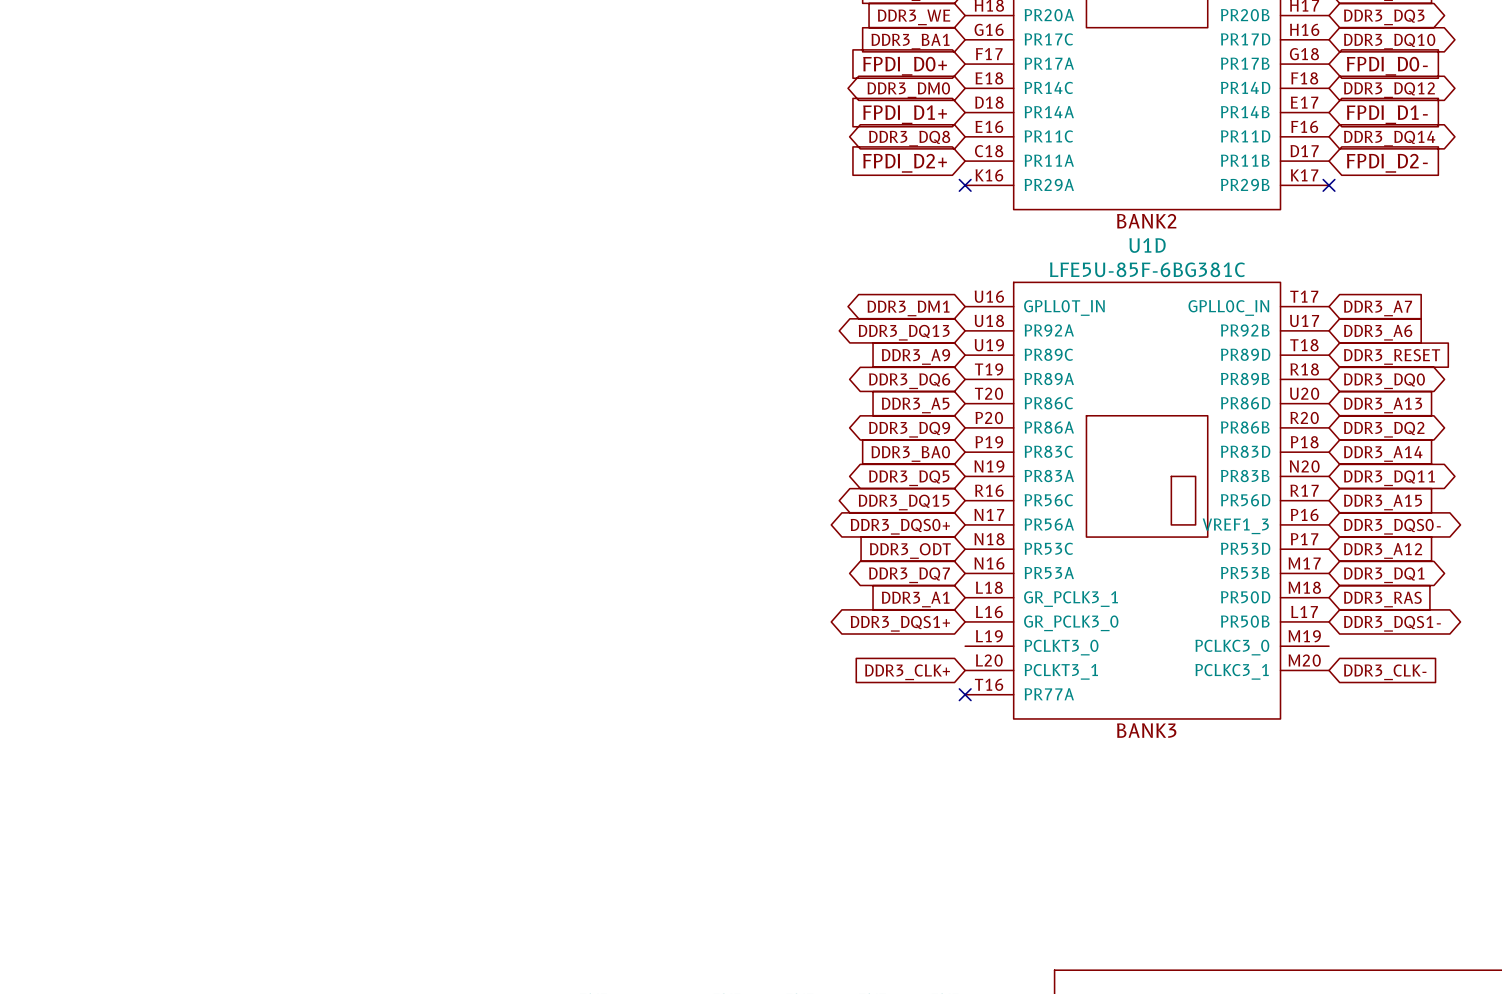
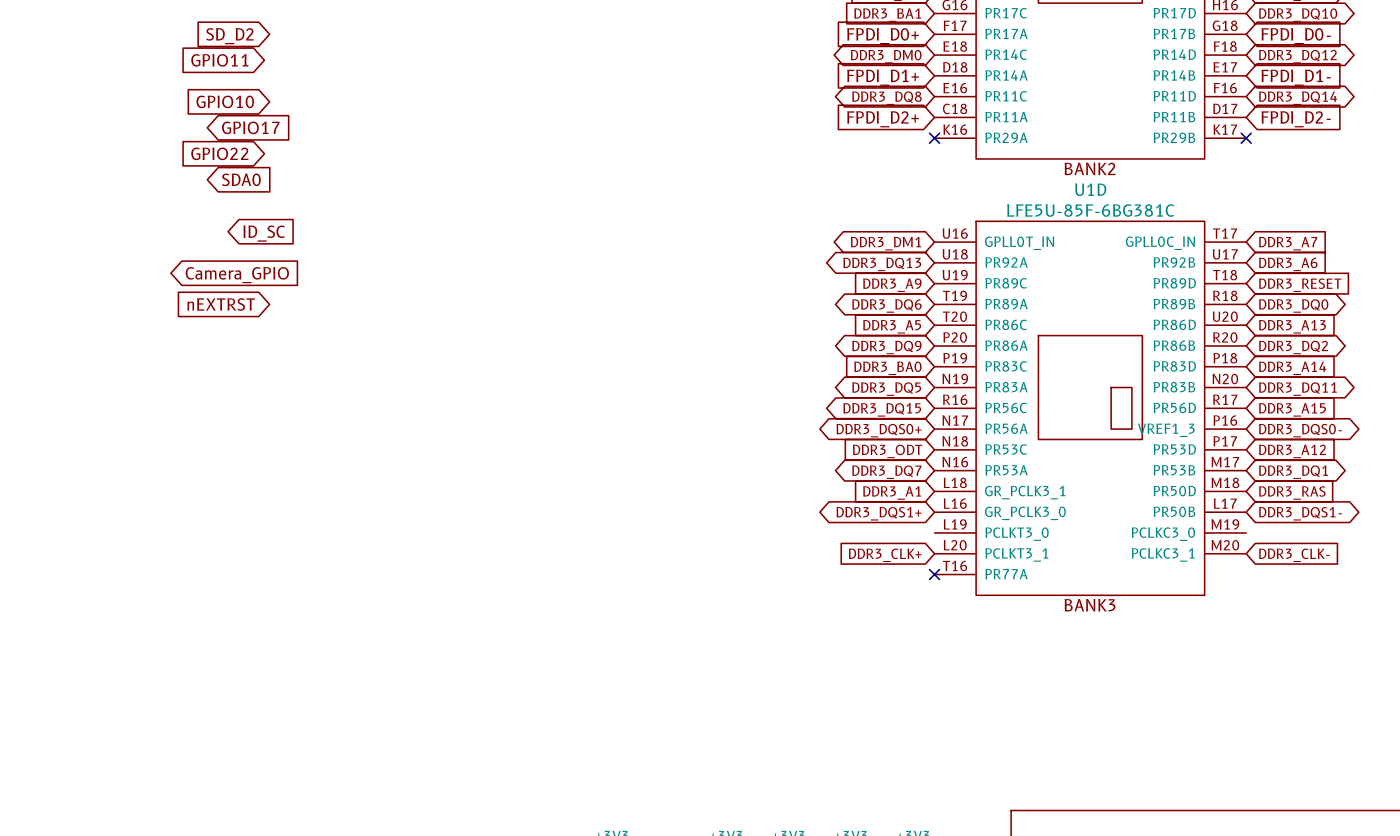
global label: none -> SD_D2 (229, 36)
global label: none -> GPIO11 (219, 60)
global label: none -> GPIO10 (225, 101)
global label: none -> GPIO17 (250, 127)
global label: none -> GPIO22 (219, 153)
global label: none -> SDA0 (241, 179)
global label: none -> ID_SC (264, 233)
global label: none -> Camera_GPIO (237, 275)
global label: none -> nEXTRST (221, 304)

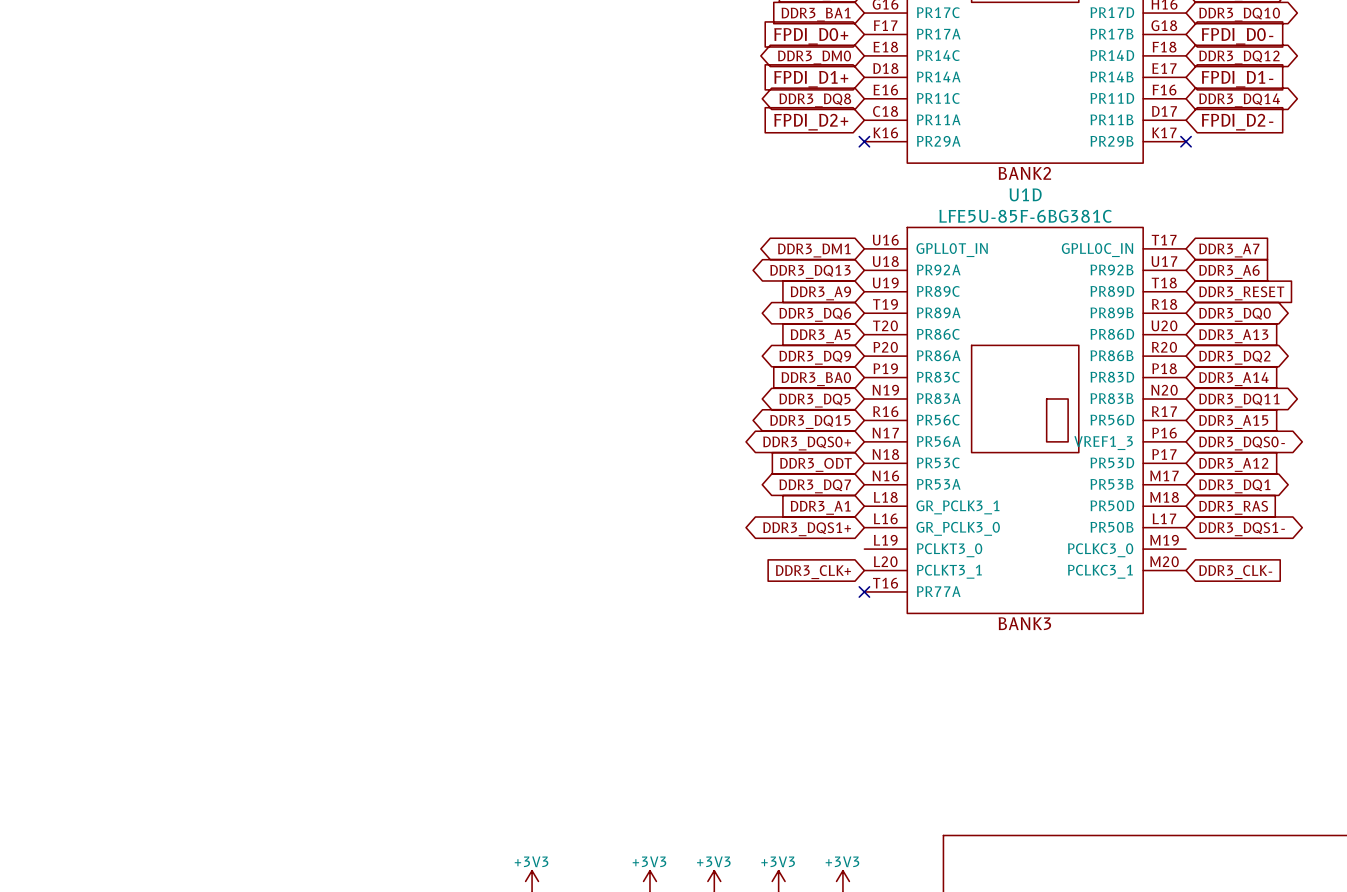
global label: SD_D2 (229, 36) -> none
global label: GPIO11 (219, 60) -> none
global label: GPIO10 (225, 101) -> none
global label: GPIO17 (250, 127) -> none
global label: GPIO22 (219, 153) -> none
global label: SDA0 (241, 179) -> none
global label: ID_SC (264, 233) -> none
global label: Camera_GPIO (237, 275) -> none
global label: nEXTRST (221, 304) -> none

